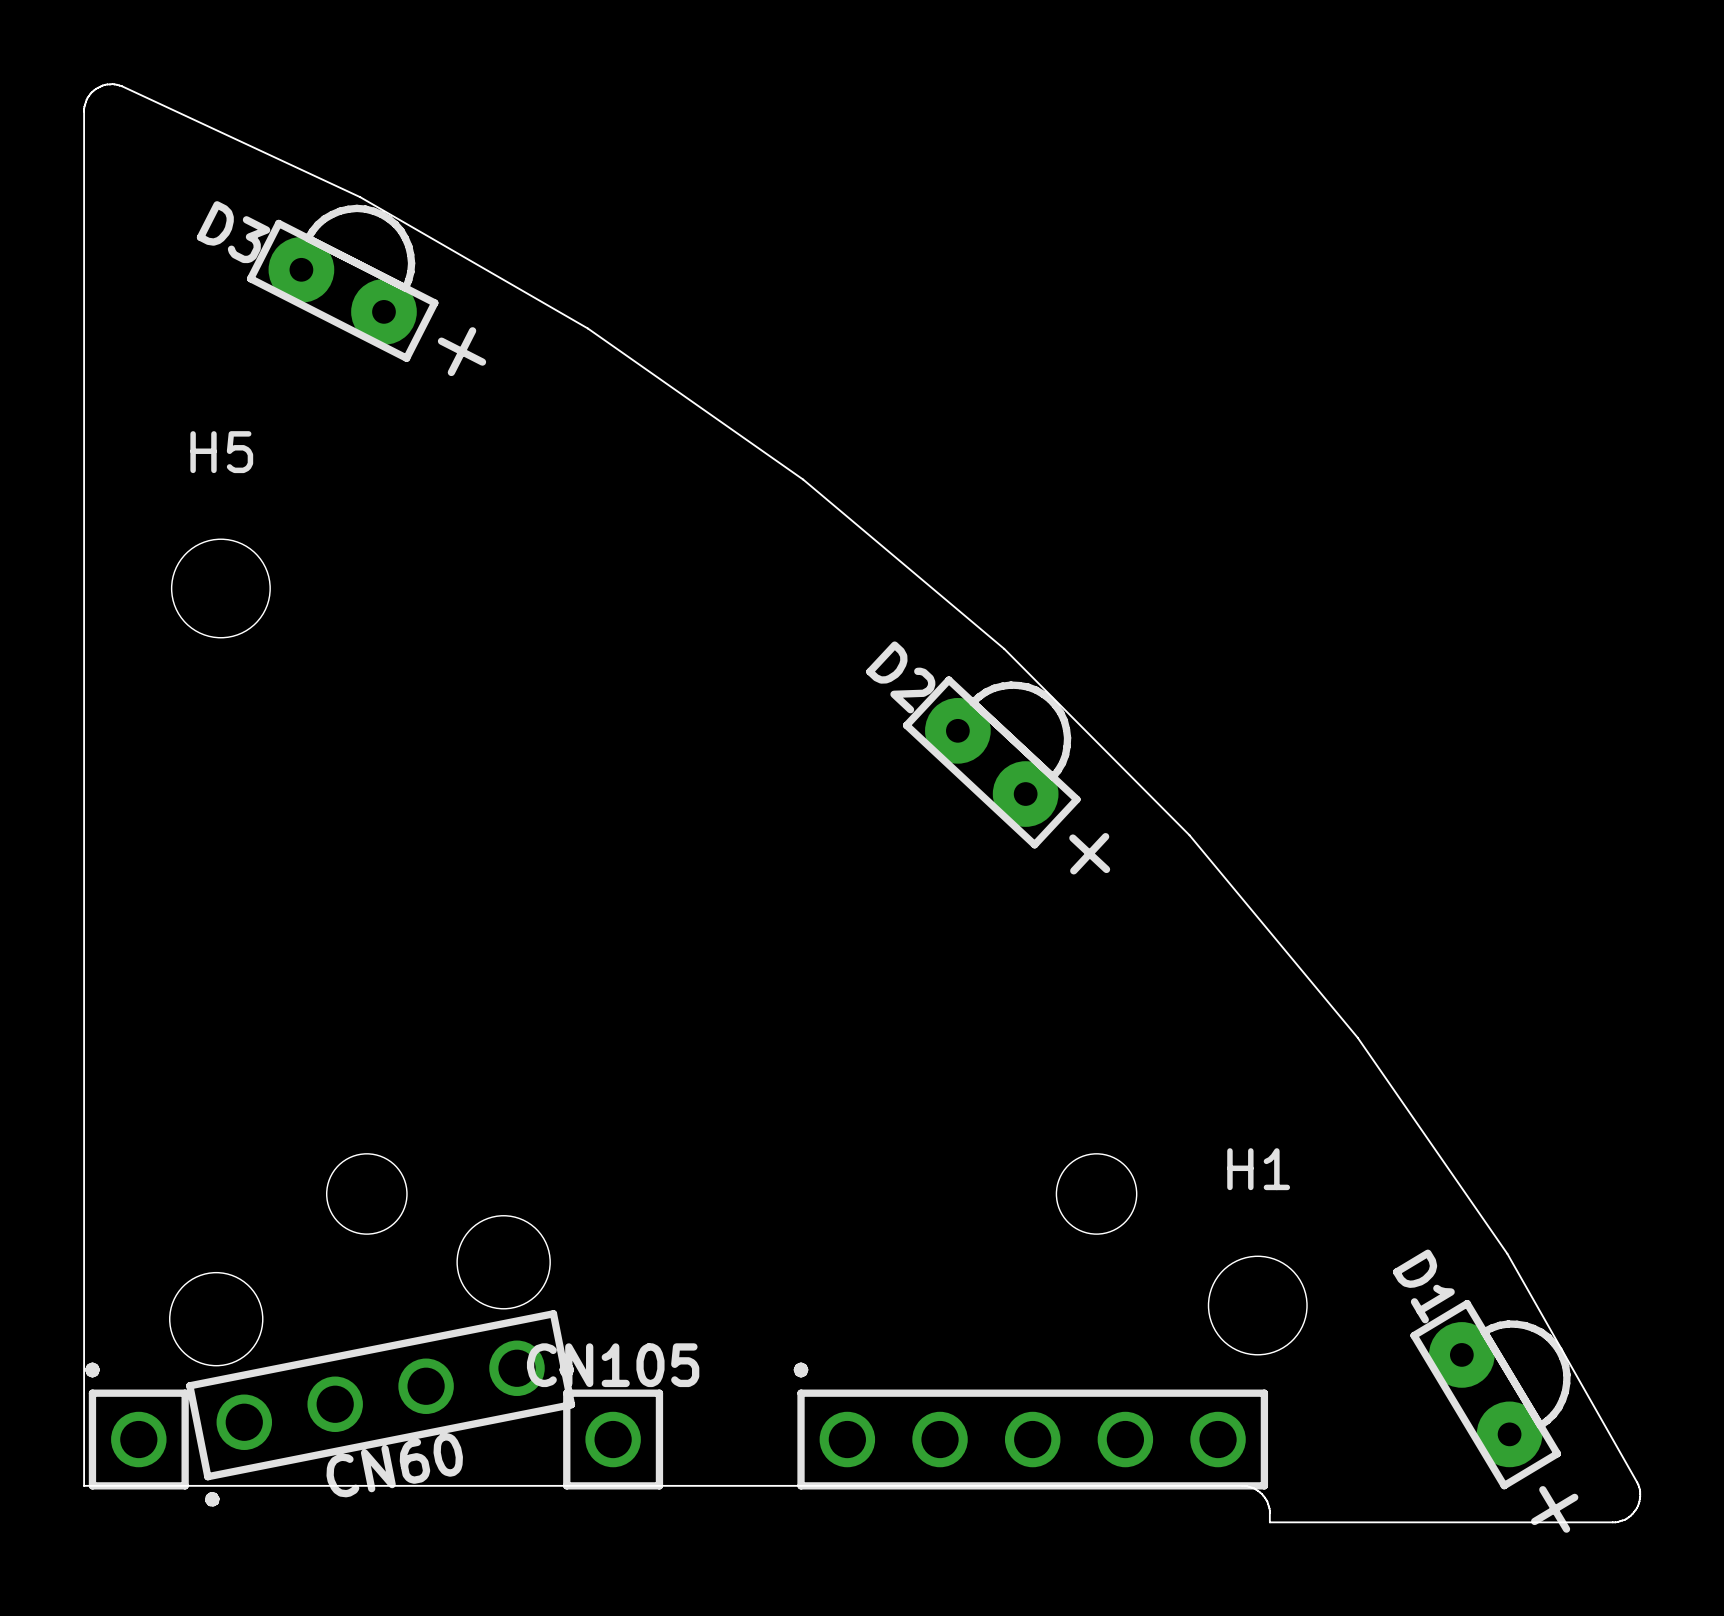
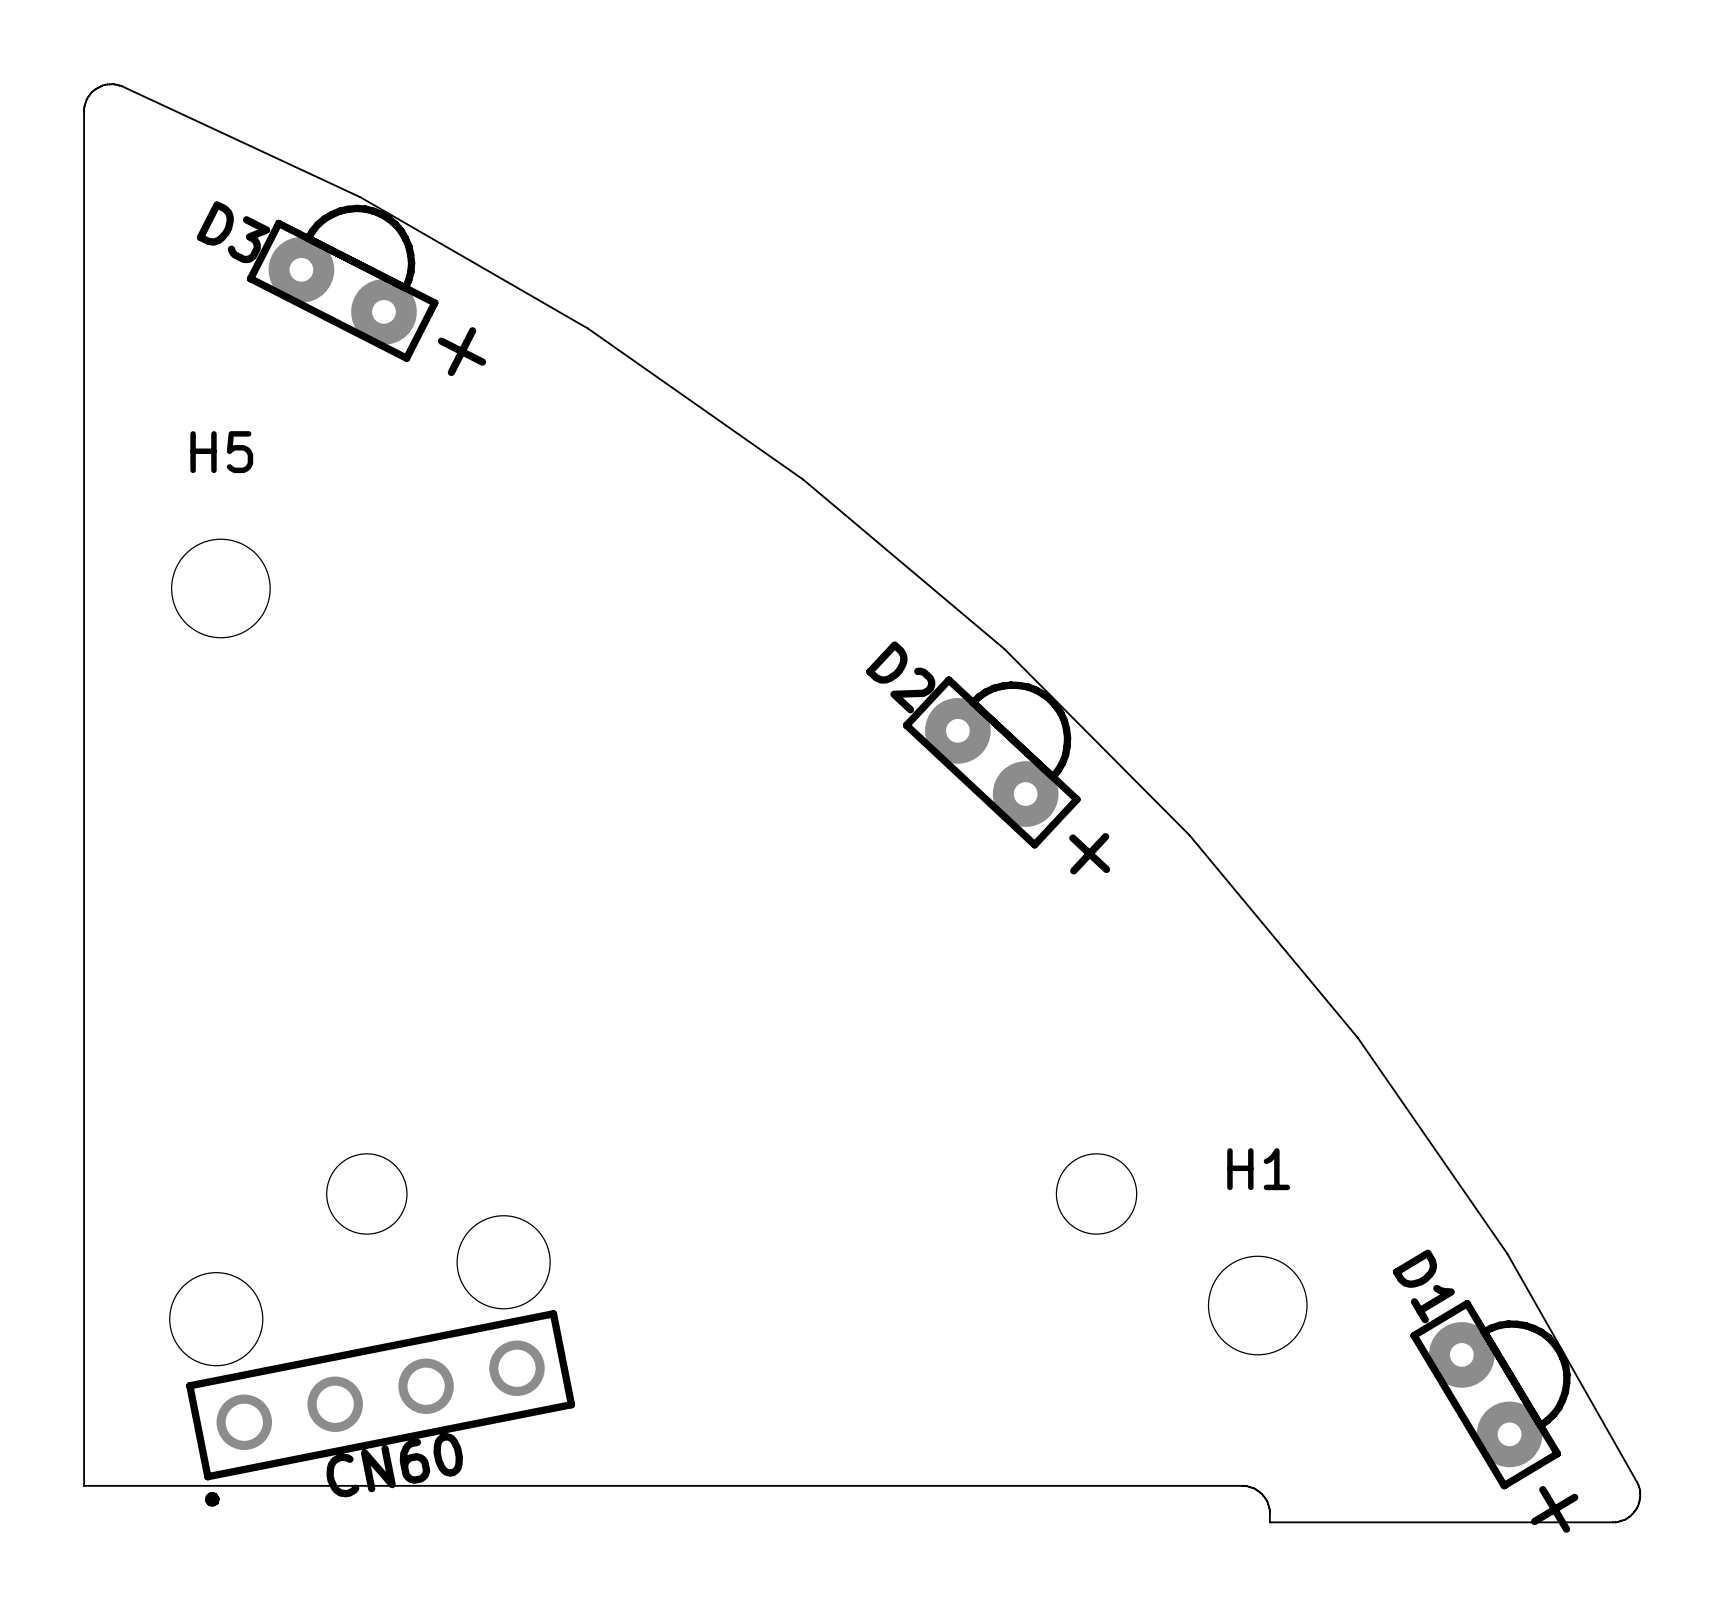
CN105: (676, 1426) -> none

